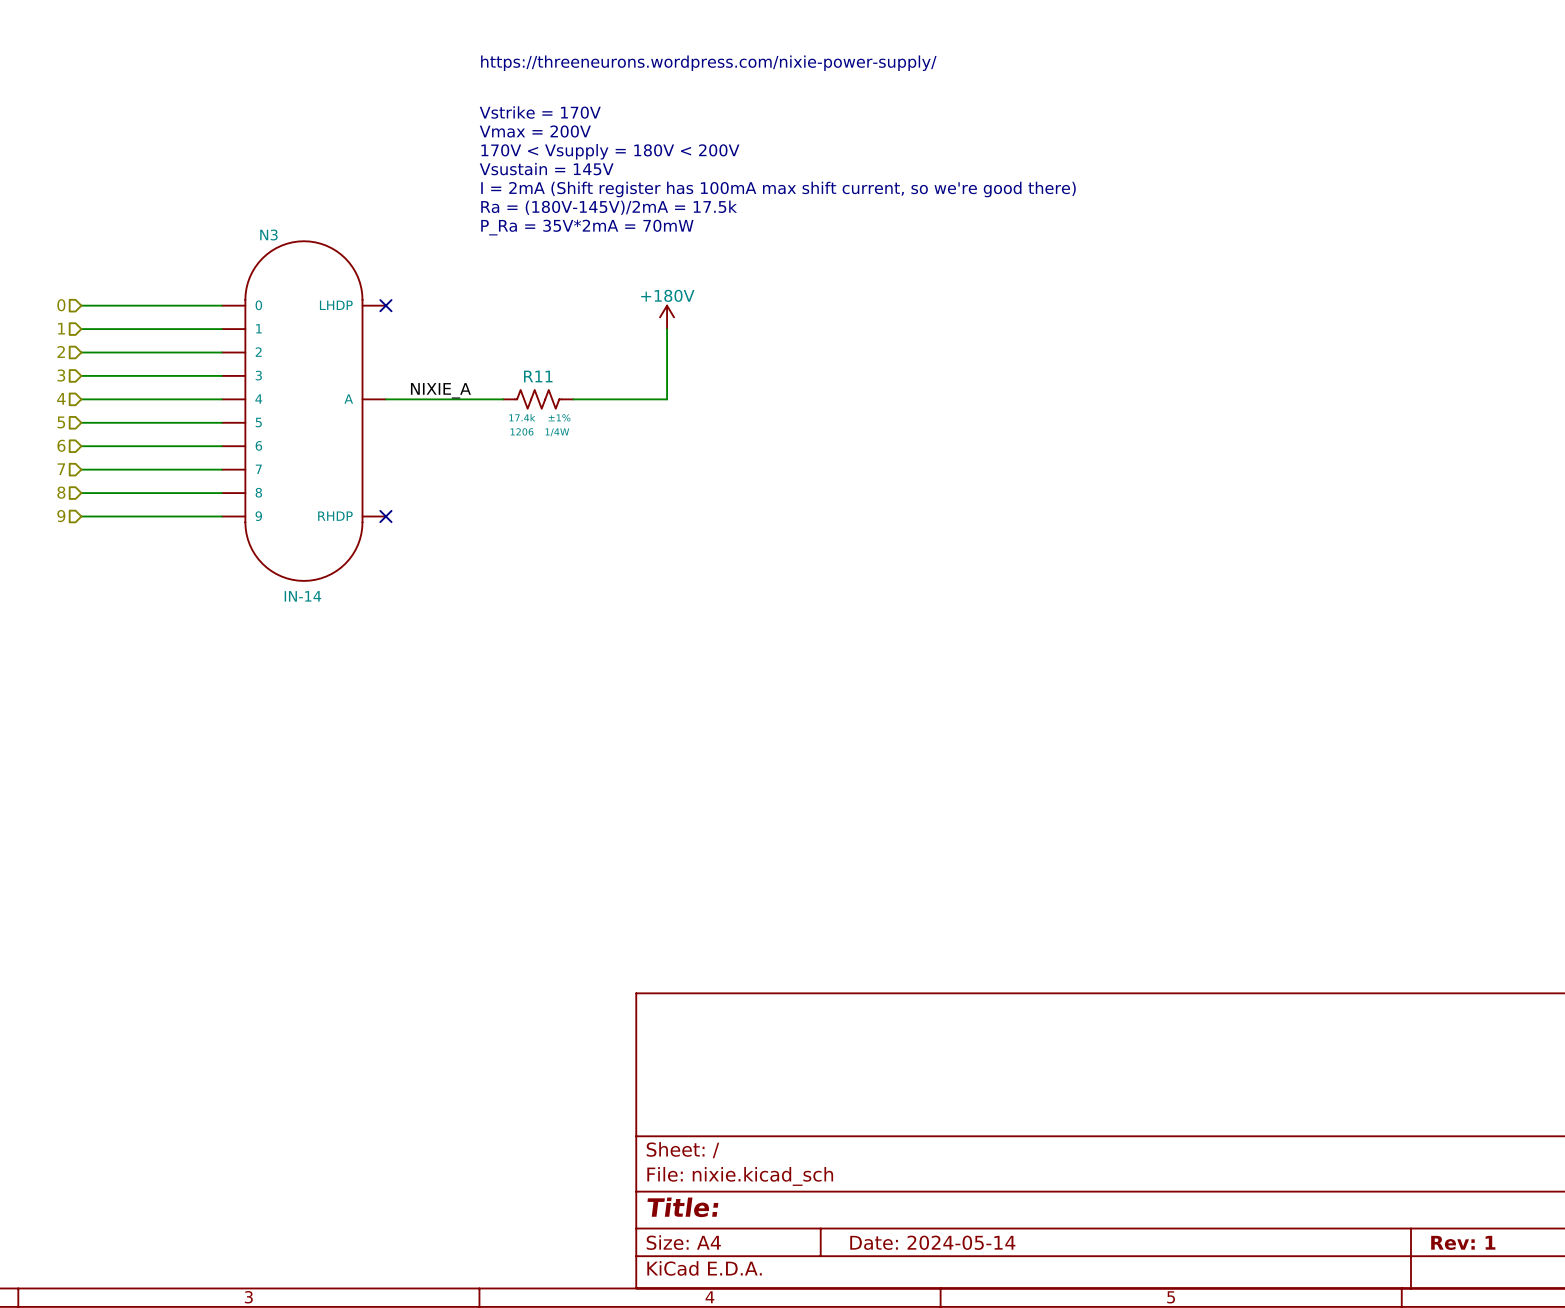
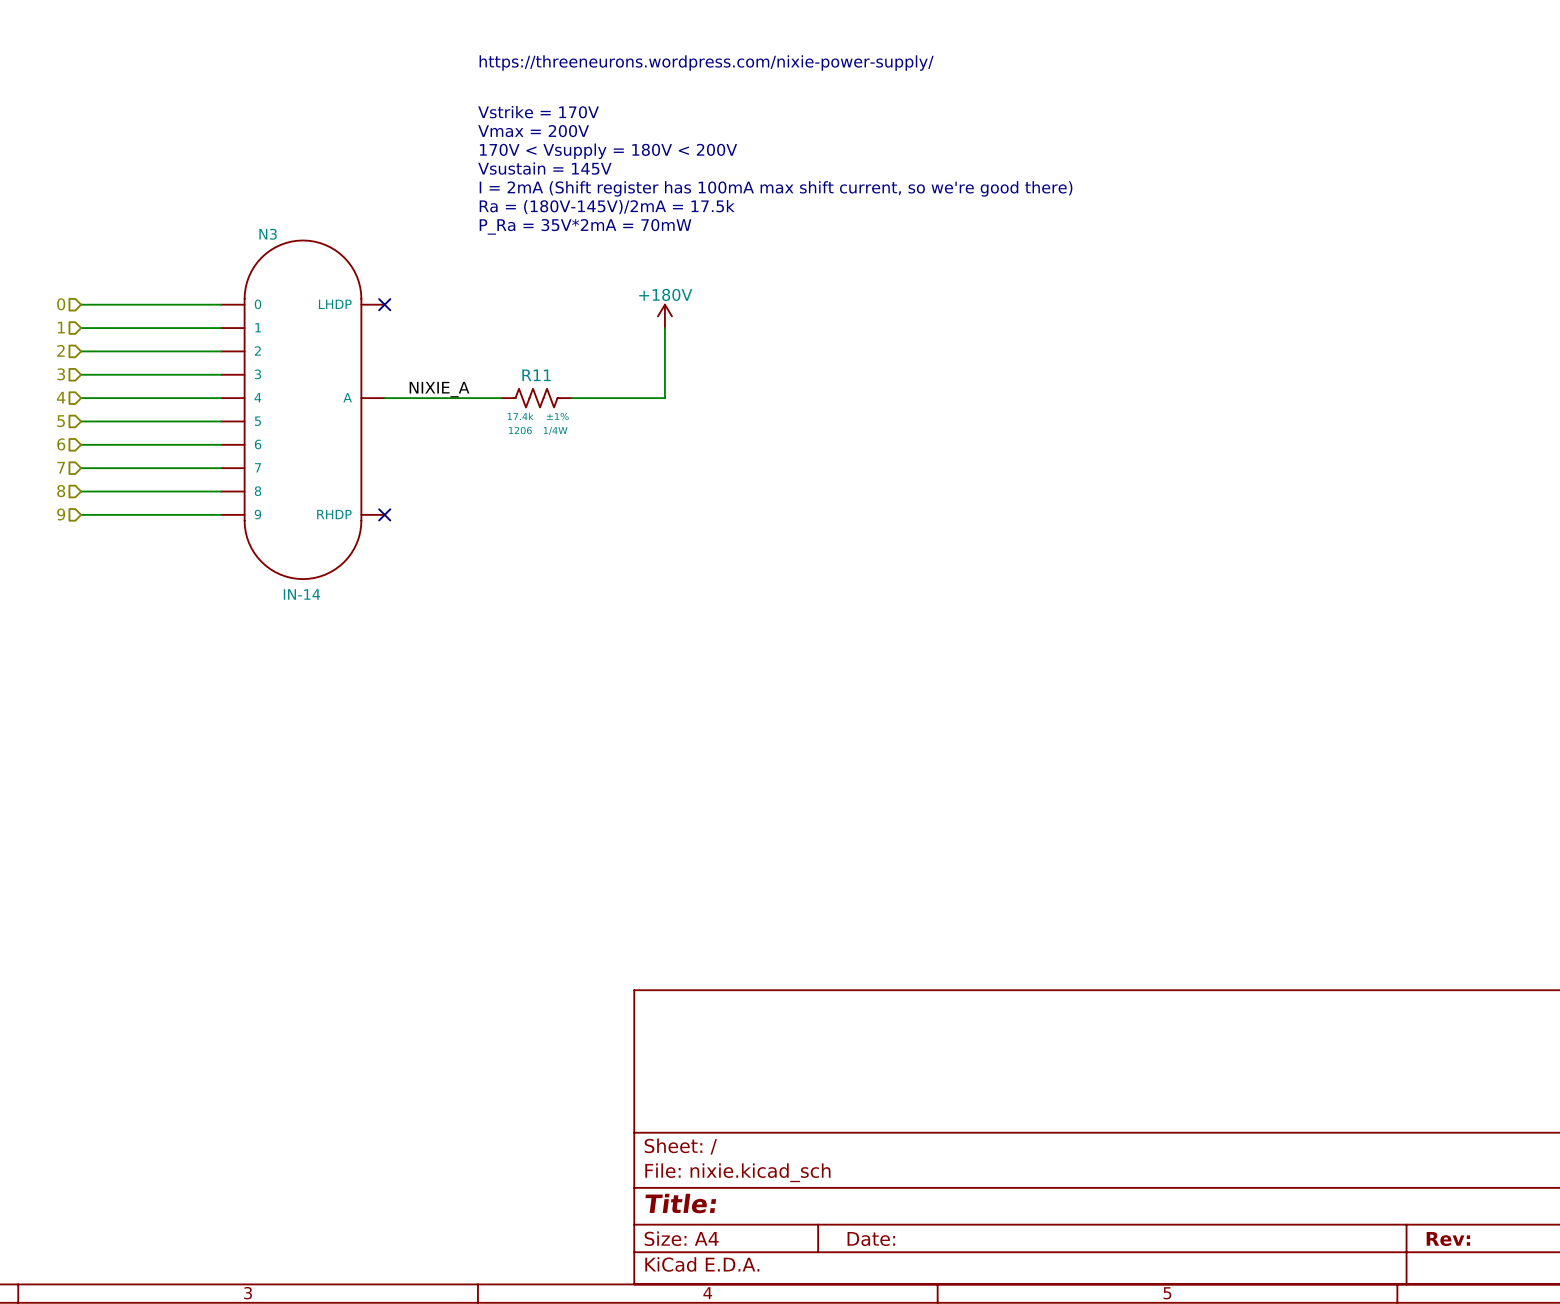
title block: Date: 2024-05-14 (932, 1242) -> Date: (871, 1238)
title block: Rev: 1 (1463, 1242) -> Rev: (1448, 1238)

